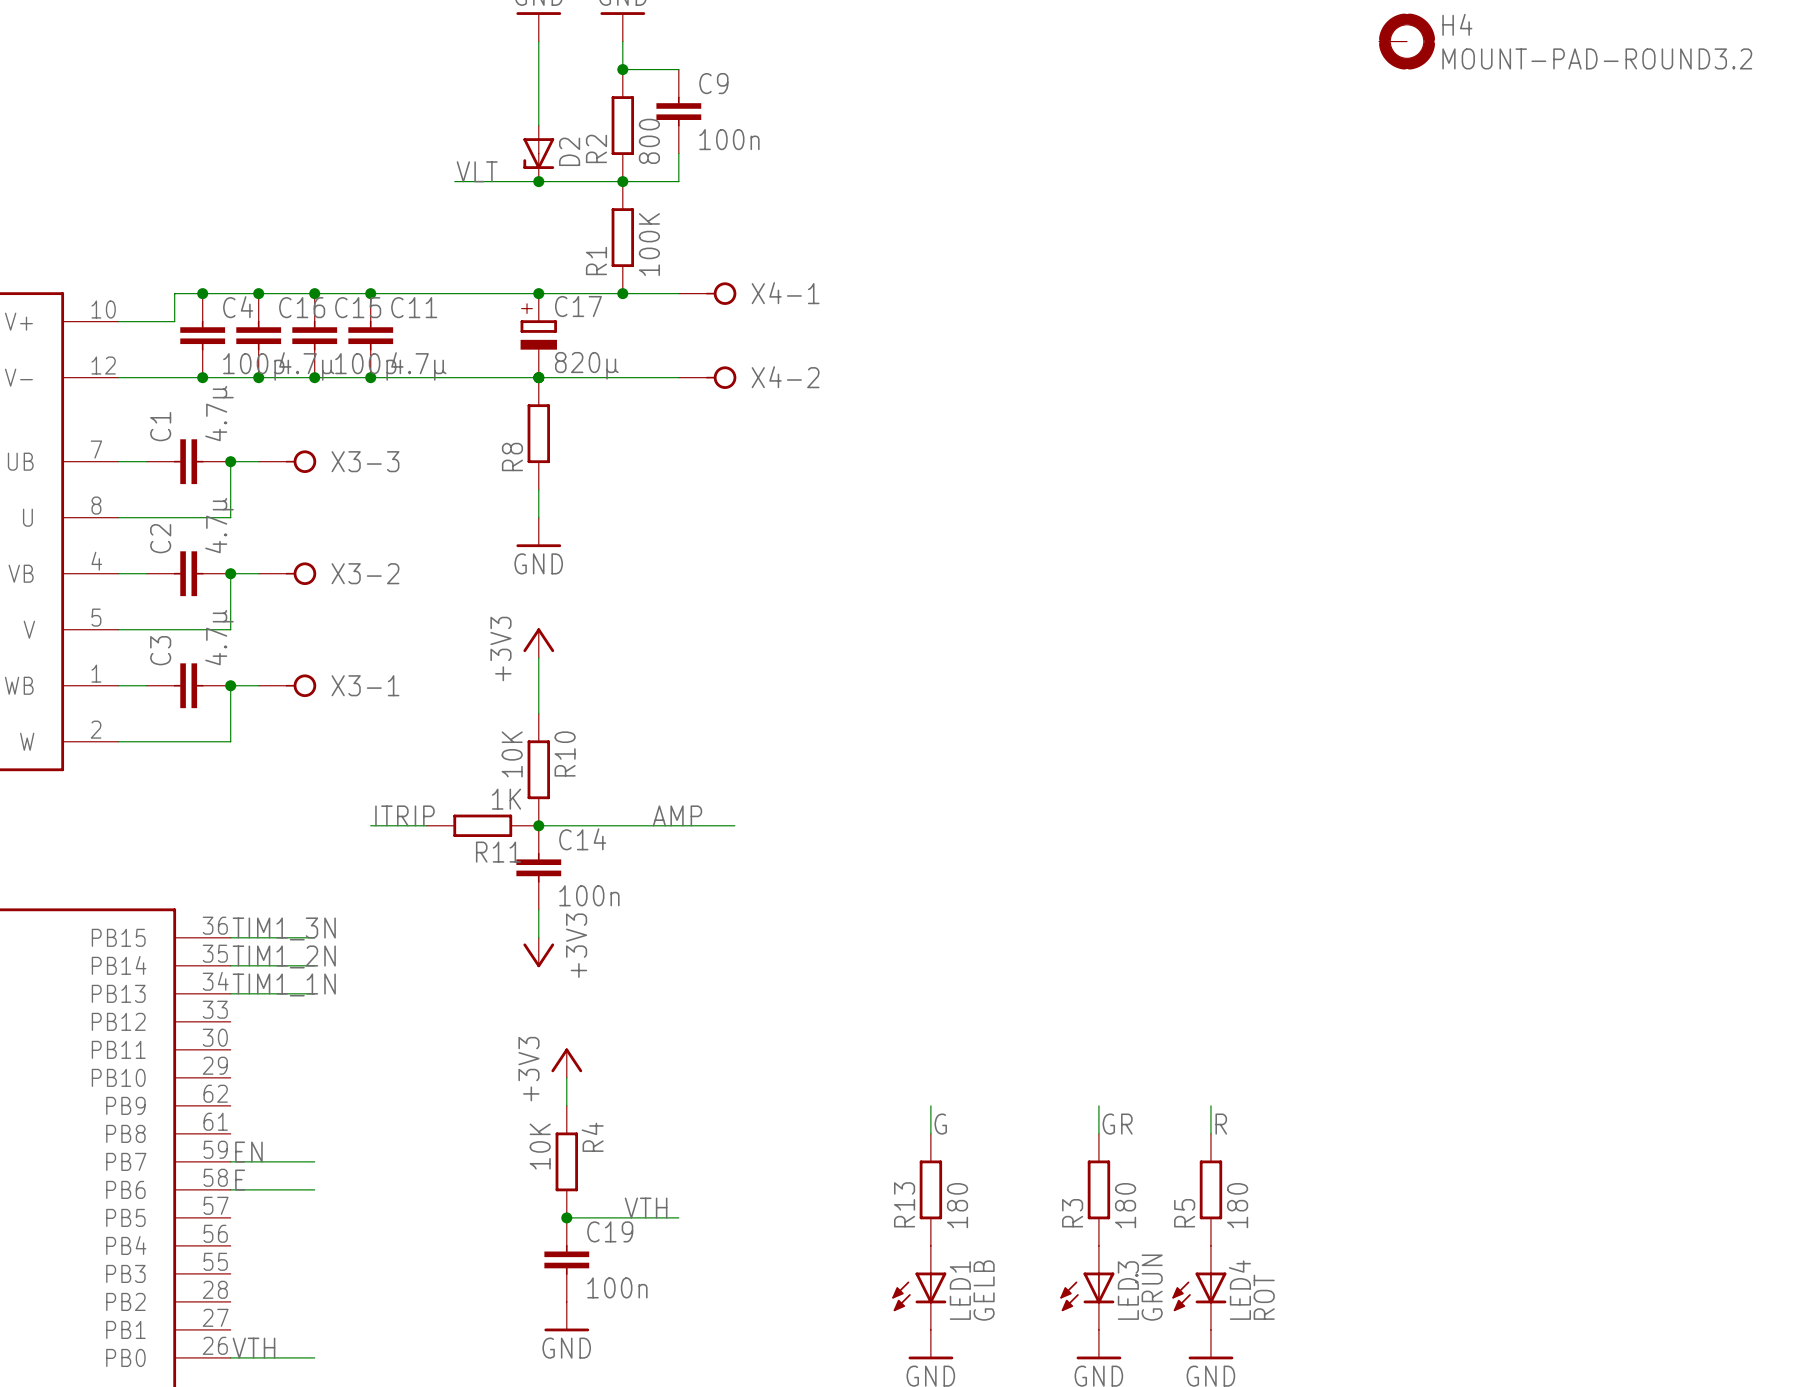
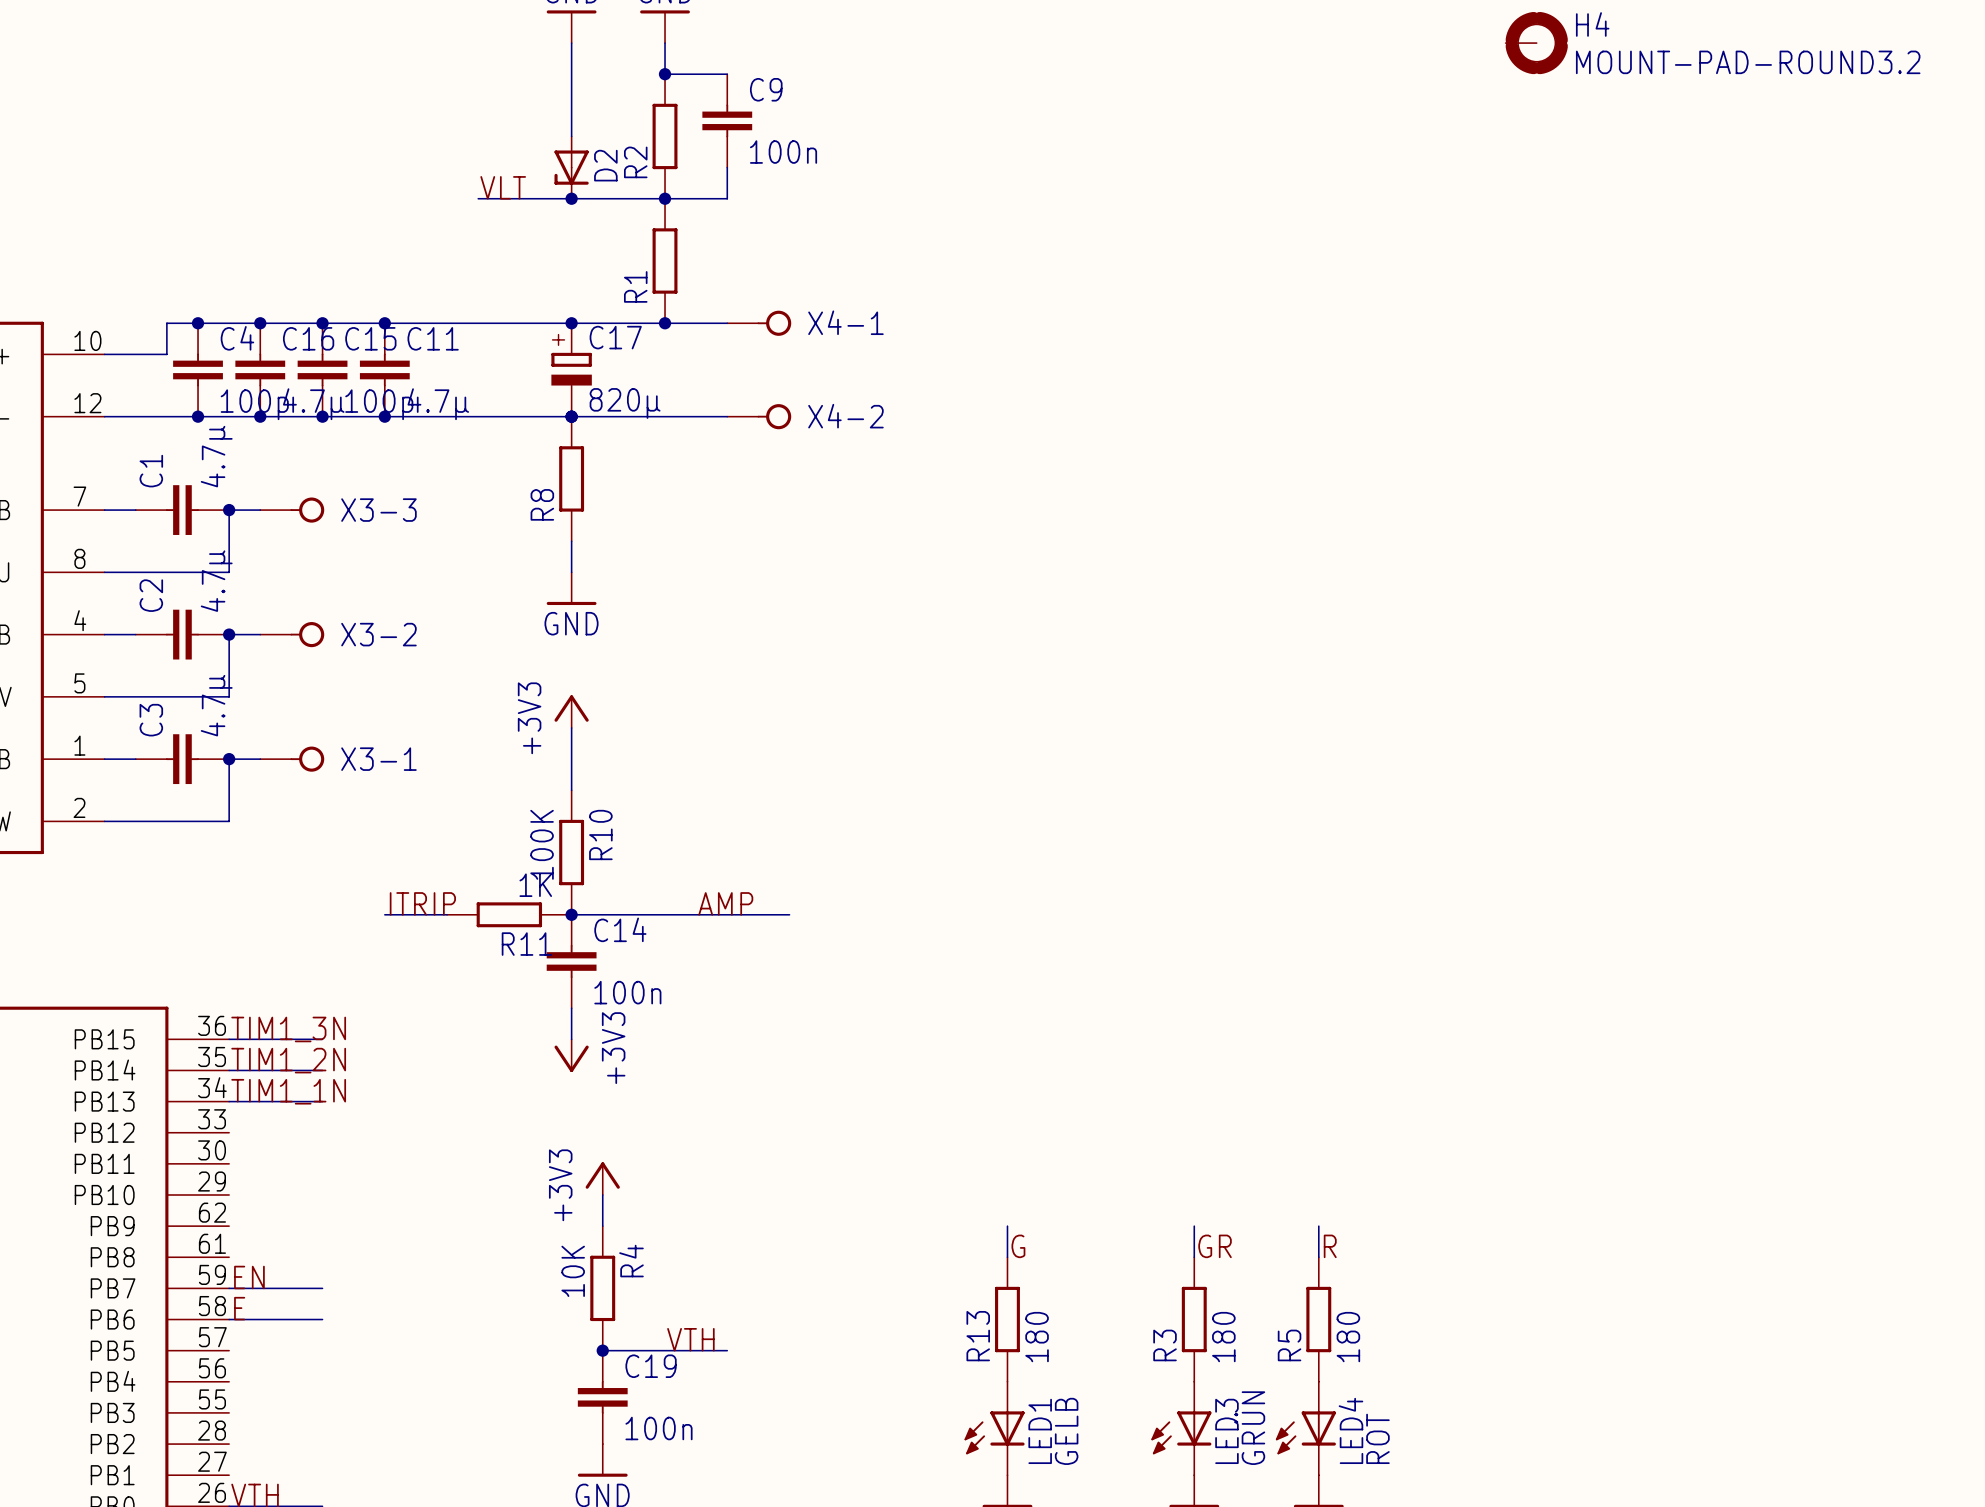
R2 value: 800 (649, 141) -> none
R1 value: 100K (649, 244) -> none
R10 value: 10K (512, 754) -> 100K (542, 844)

